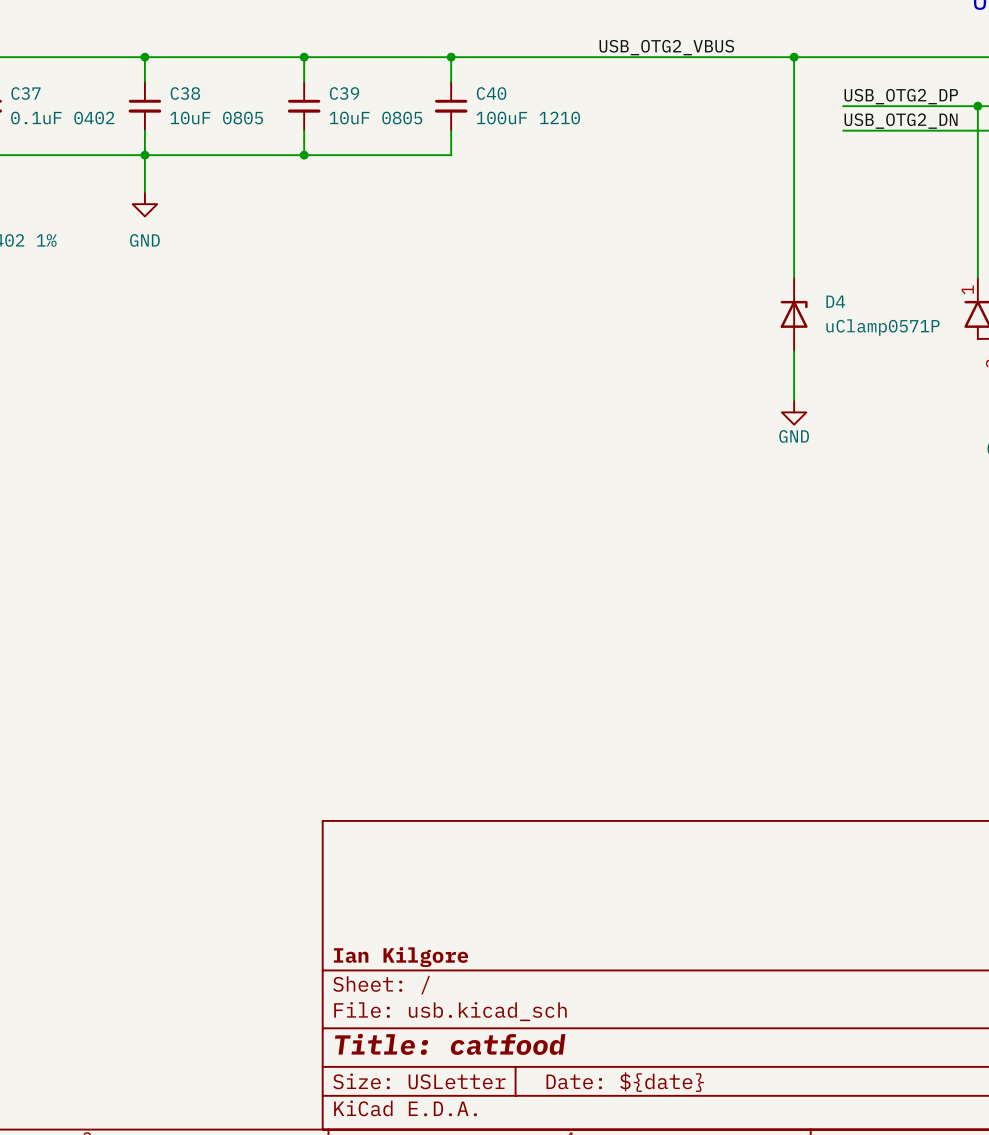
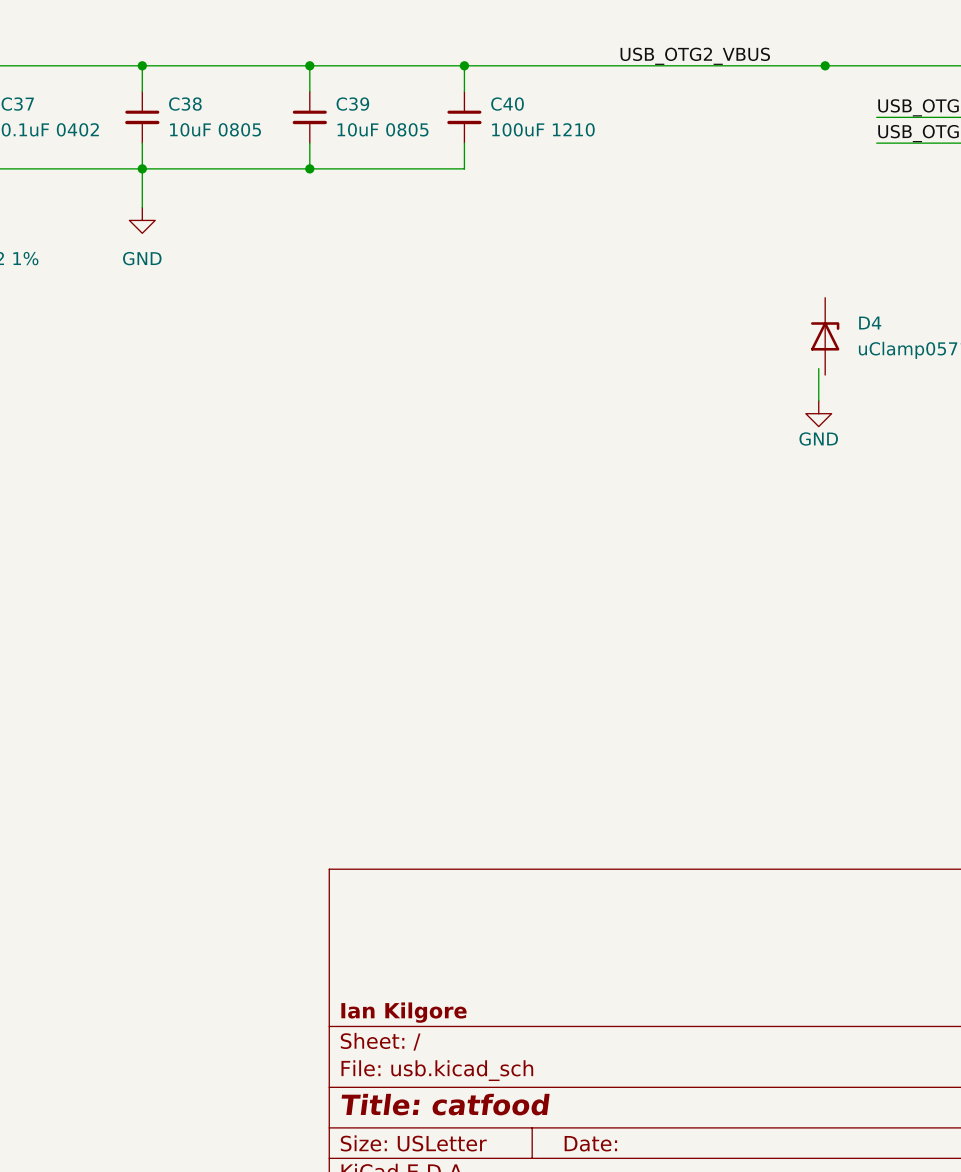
wire: (794, 57) (794, 277) -> none
wire: none -> (818, 368) (818, 400)
wire: (794, 351) (794, 400) -> none
power symbol position: GND (794, 412) -> GND (818, 413)
title block: Date: ${date} (625, 1082) -> Date: (590, 1143)

